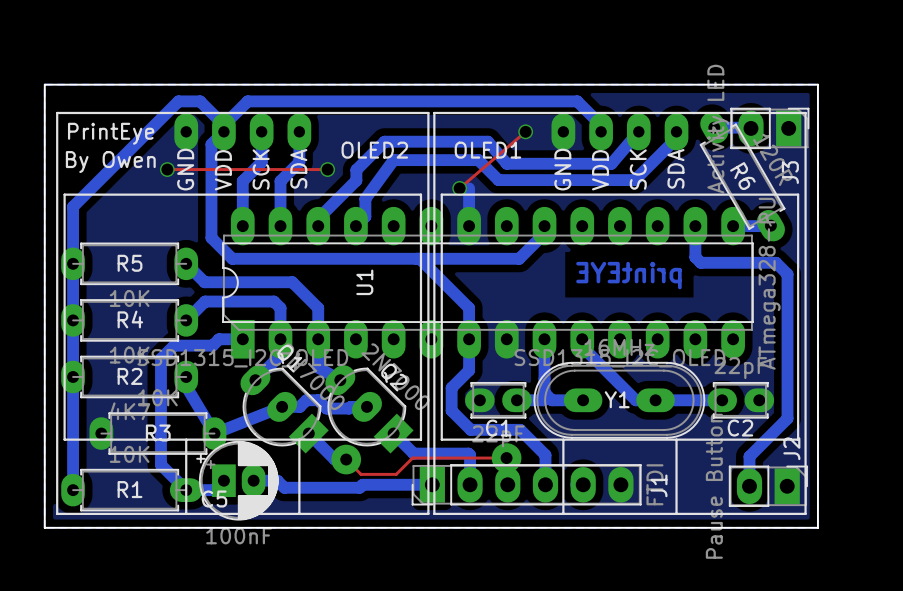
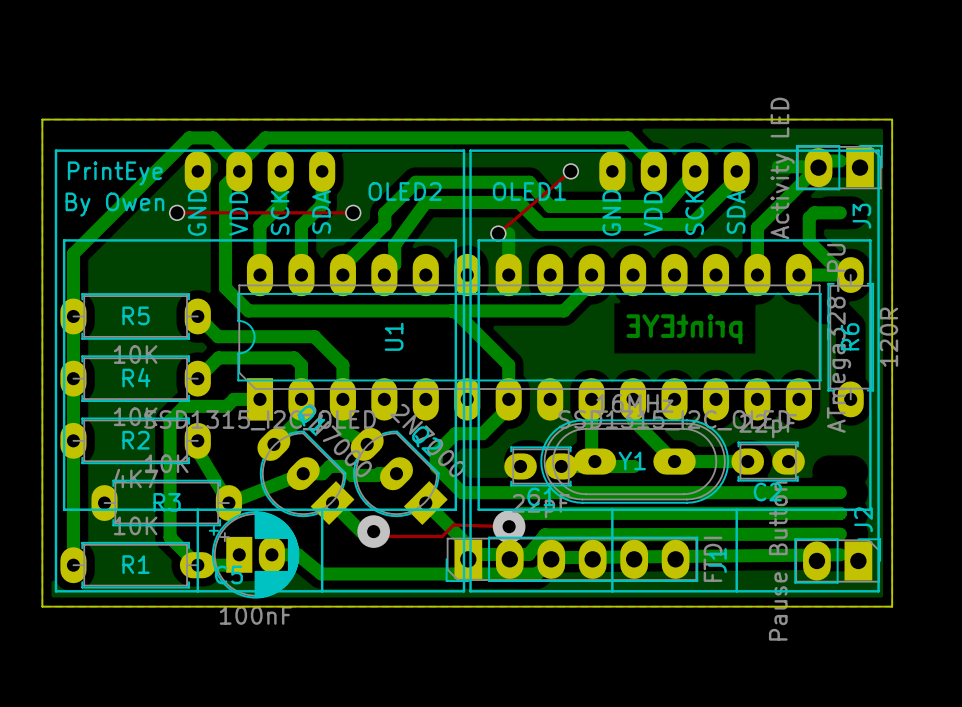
bottom track: none -> (840, 212) (814, 212) (809, 217) (809, 241) (832, 264) (850, 275)
R6 rotation: 0° (742, 176) -> 30° clockwise (850, 337)
R6 position: (742, 176) -> (850, 337)
bottom track: (695, 226) (695, 257) (700, 262) (776, 262) (787, 274) (787, 418) (749, 456) (749, 486) -> (757, 275) (757, 227) (824, 161) (840, 161)
bottom track: (469, 346) (469, 370) (451, 387) (451, 410) (470, 429) (520, 429) (545, 455) (545, 484) -> (508, 407) (482, 433) (455, 433) (436, 452) (436, 466) (462, 492) (840, 492)
bottom track: (582, 346) (635, 400) (722, 400) -> (633, 407) (633, 420) (674, 461) (747, 461)
Y1 position: (619, 400) -> (634, 461)
C2 position: (740, 400) -> (768, 461)
bottom track: none -> (840, 513) (522, 513) (509, 526)
bottom track: (413, 453) (468, 453) (470, 484) -> (447, 525) (477, 554) (528, 554) (545, 534) (840, 534)
top track: none -> (509, 526) (453, 525) (442, 536) (373, 536)
top track: (506, 458) (412, 458) (396, 474) (361, 474) (346, 459) -> none
via position: (506, 458) -> (509, 526)
bottom track: (277, 480) (284, 487) (359, 487) (362, 484) (432, 484) -> (298, 554) (321, 574) (536, 574) (556, 557) (840, 554)

